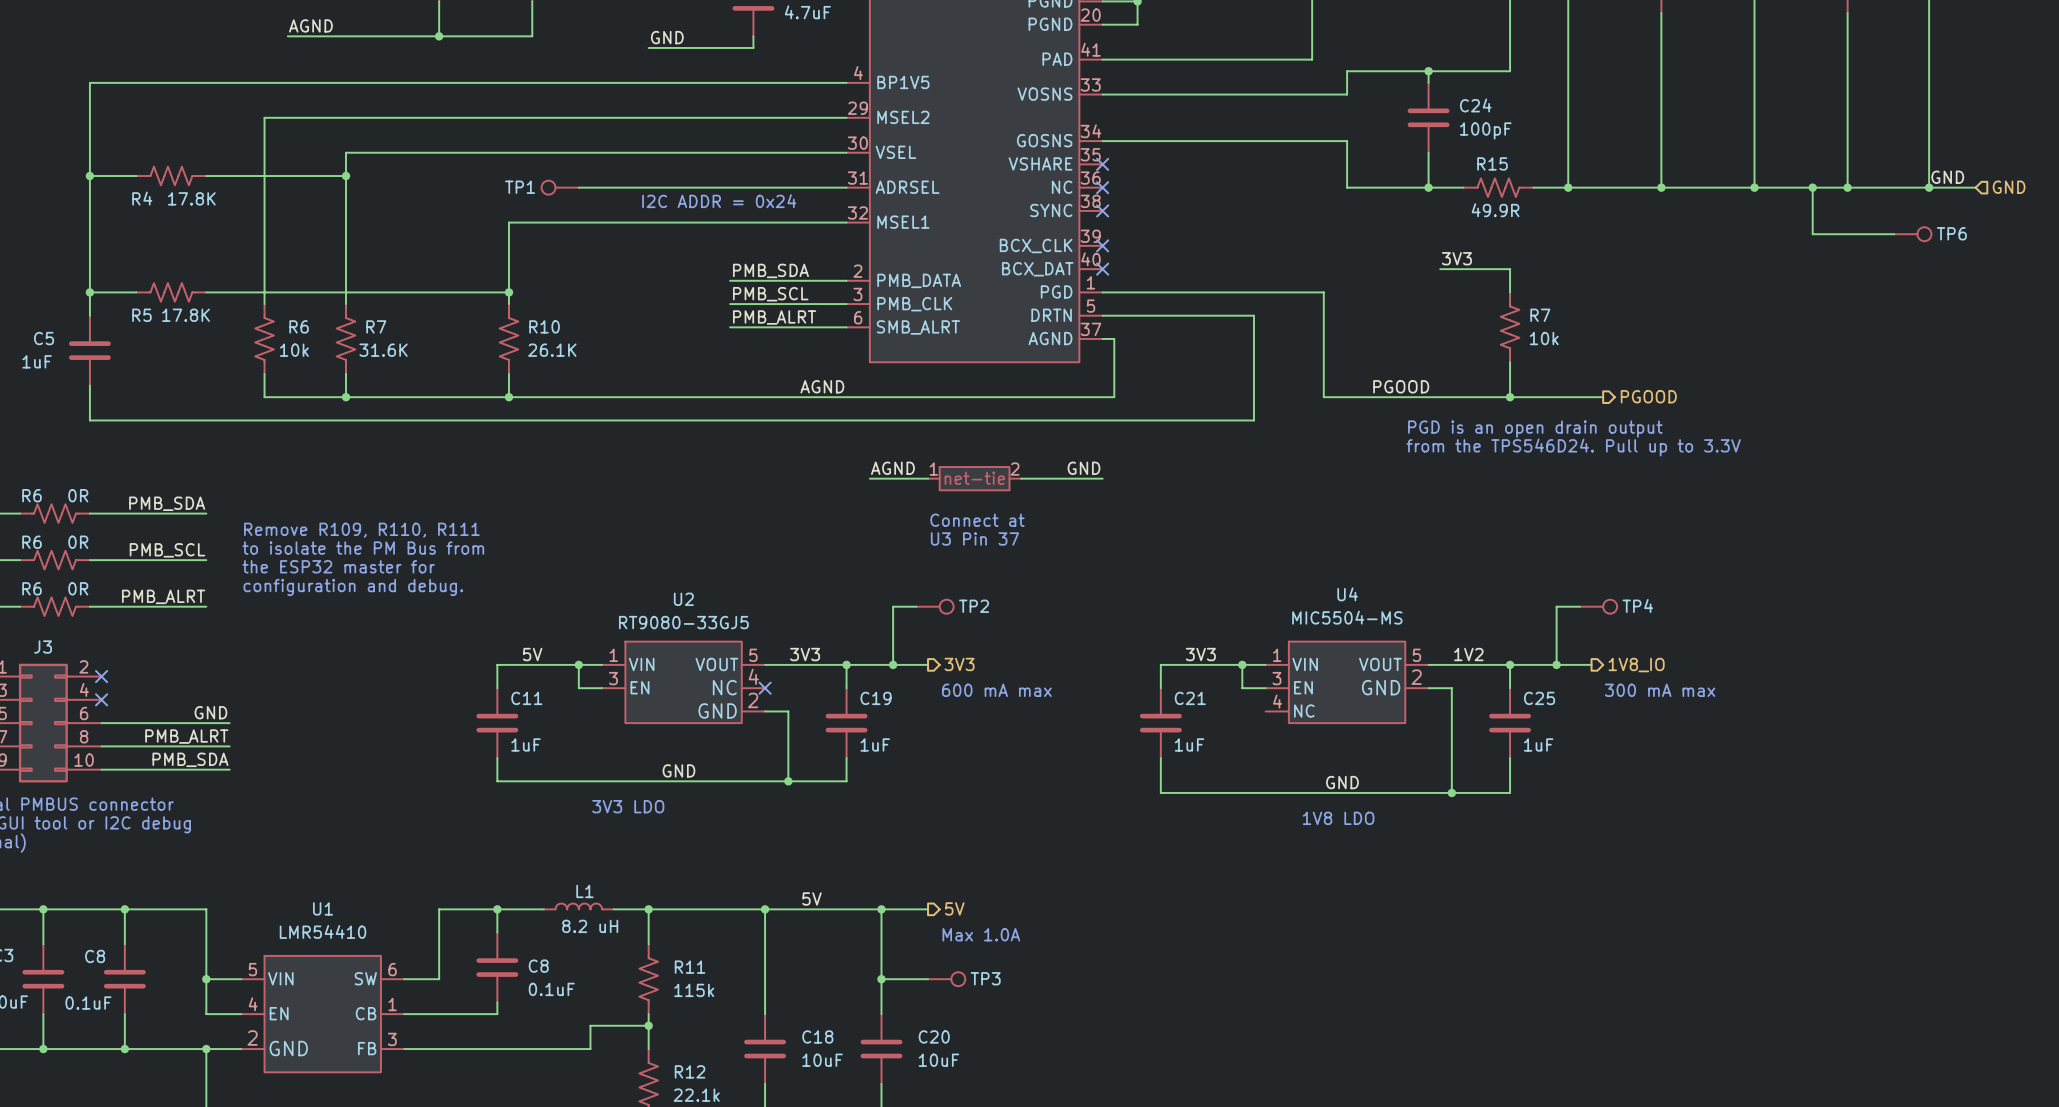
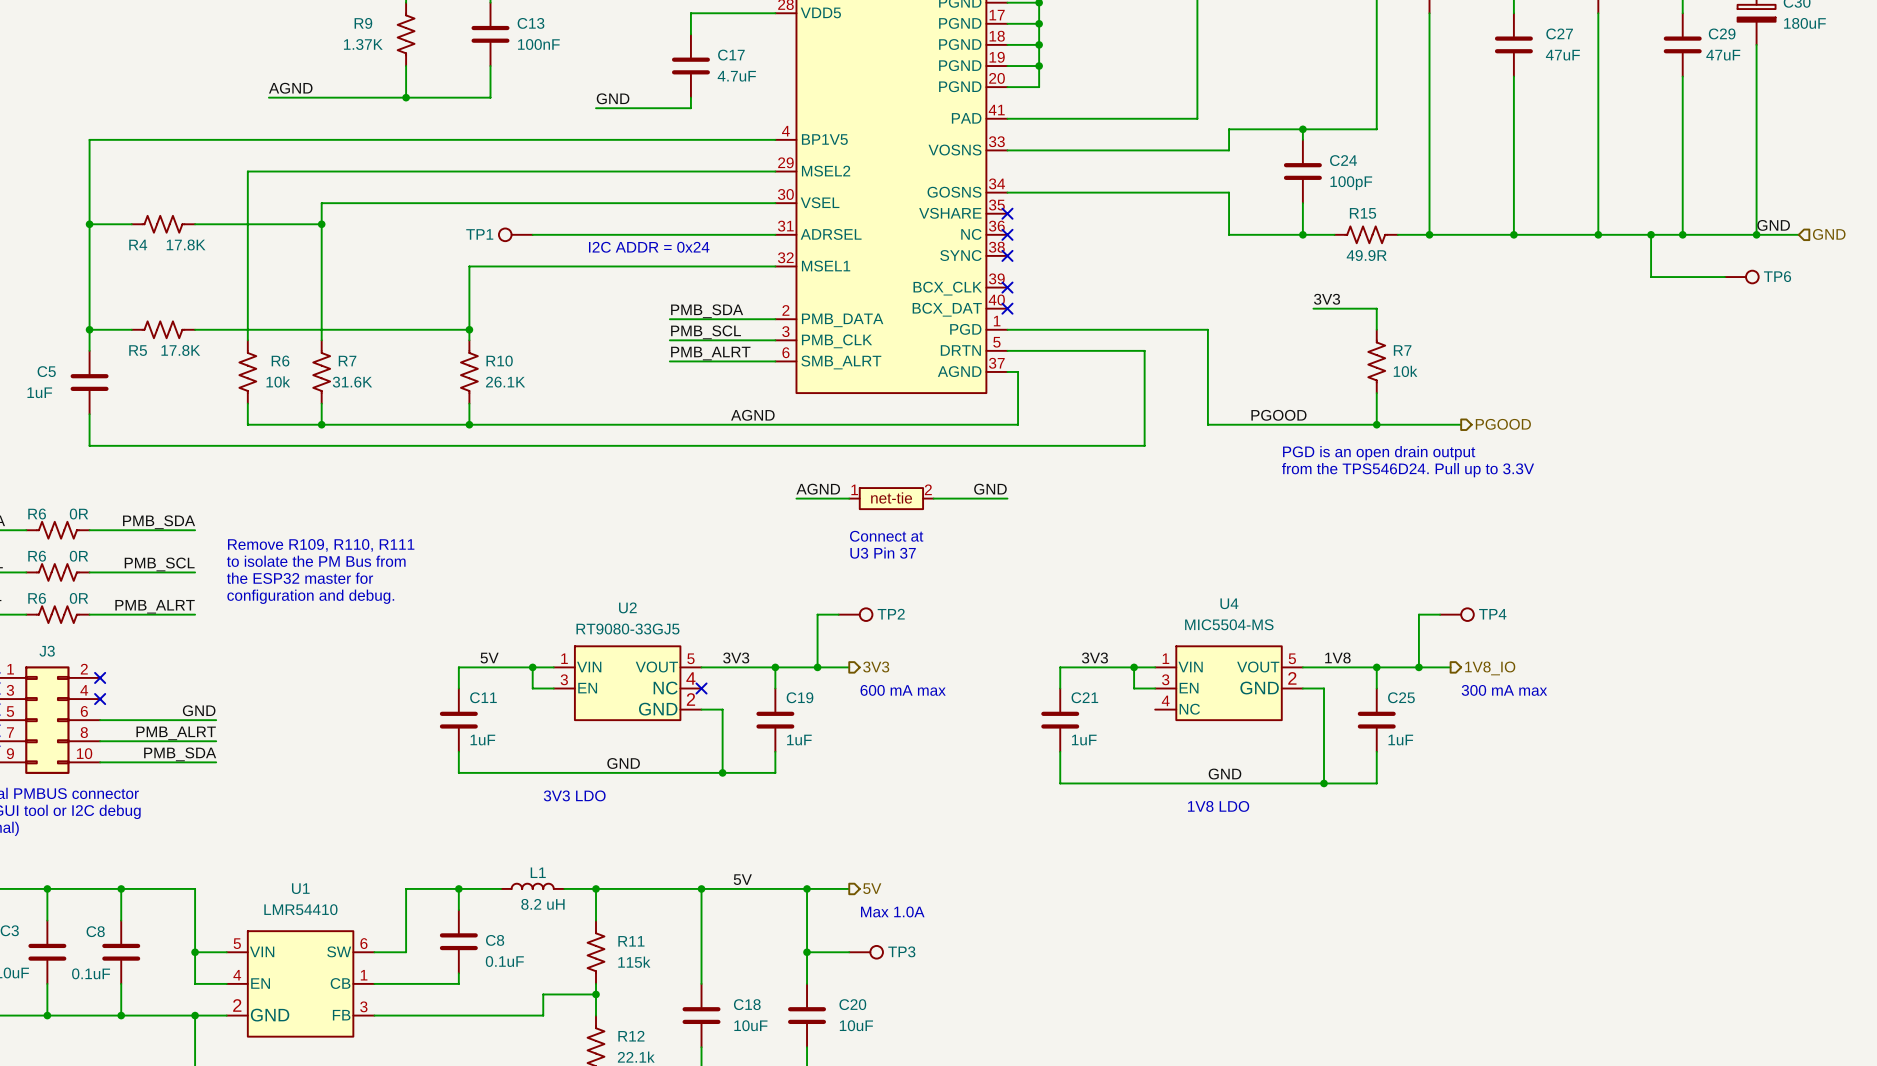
label: 1V2 (1468, 654) -> 1V8 (1337, 657)

